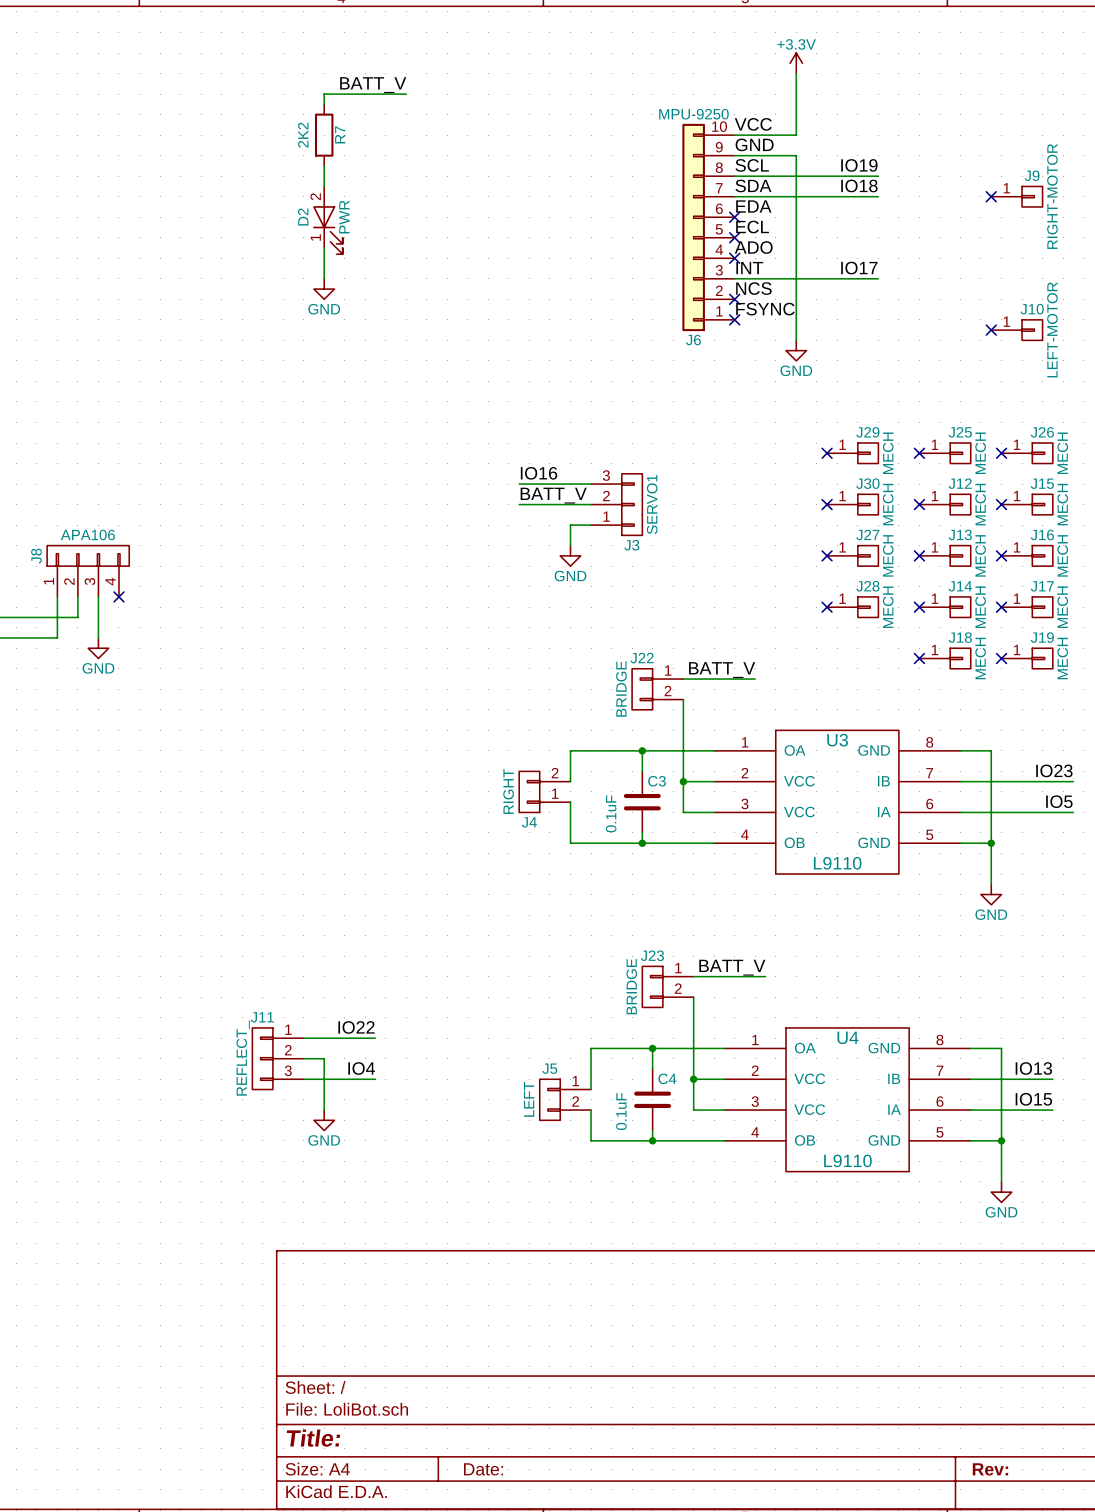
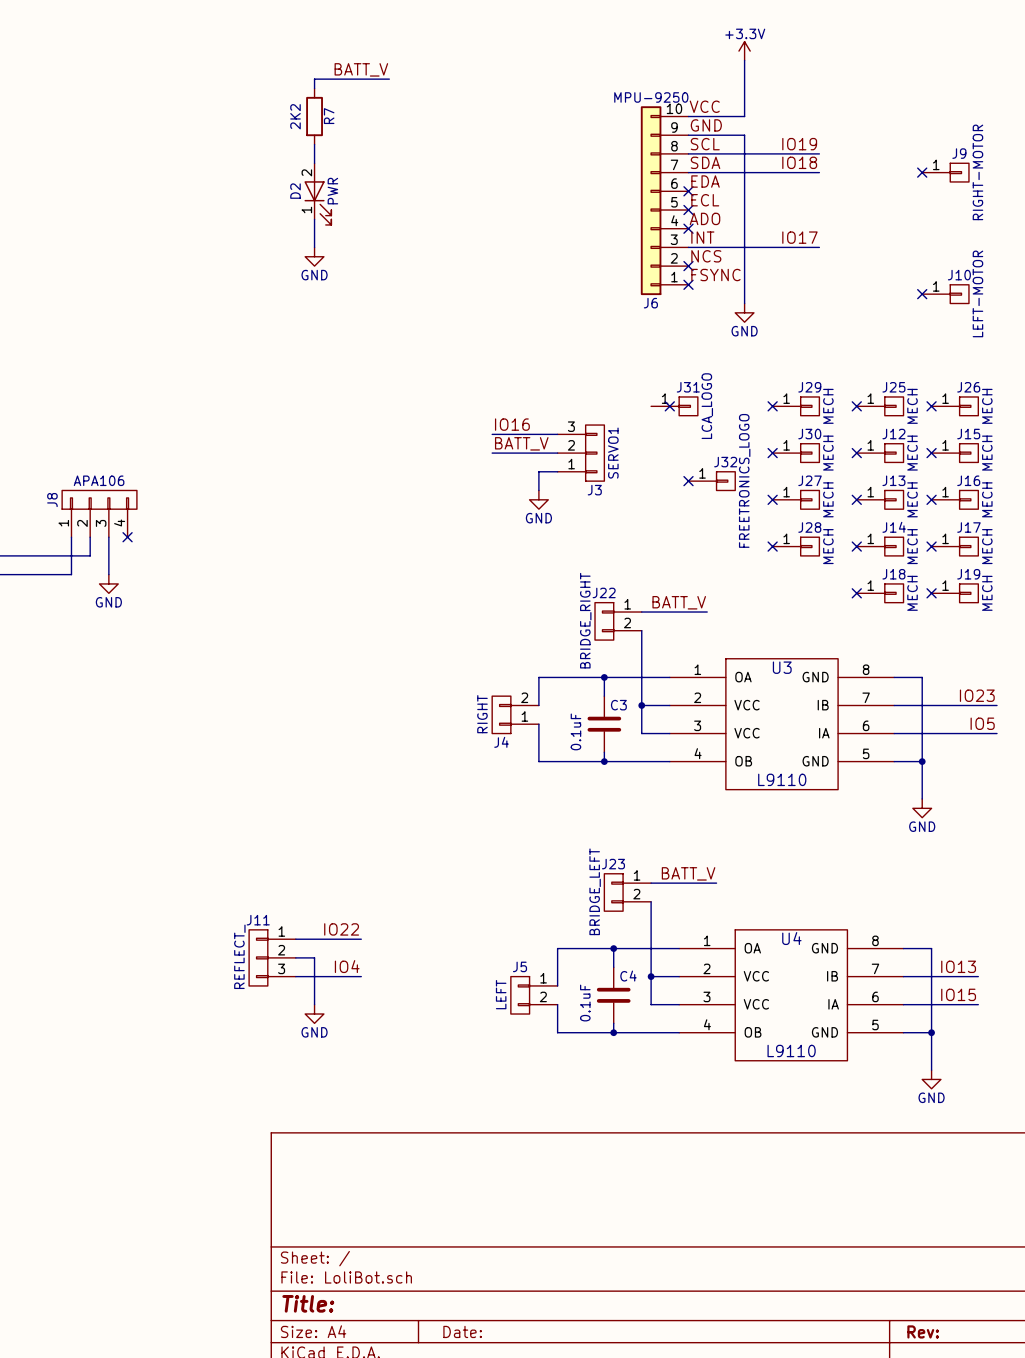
no-connect mark: none -> (669, 406)
J31: none -> LCA_LOGO (674, 406)
no-connect mark: none -> (688, 481)
J32: none -> FREETRONICS_LOGO (711, 481)
J22 value: BRIDGE (621, 689) -> BRIDGE_RIGHT (585, 620)
J23 value: BRIDGE (631, 986) -> BRIDGE_LEFT (595, 891)

